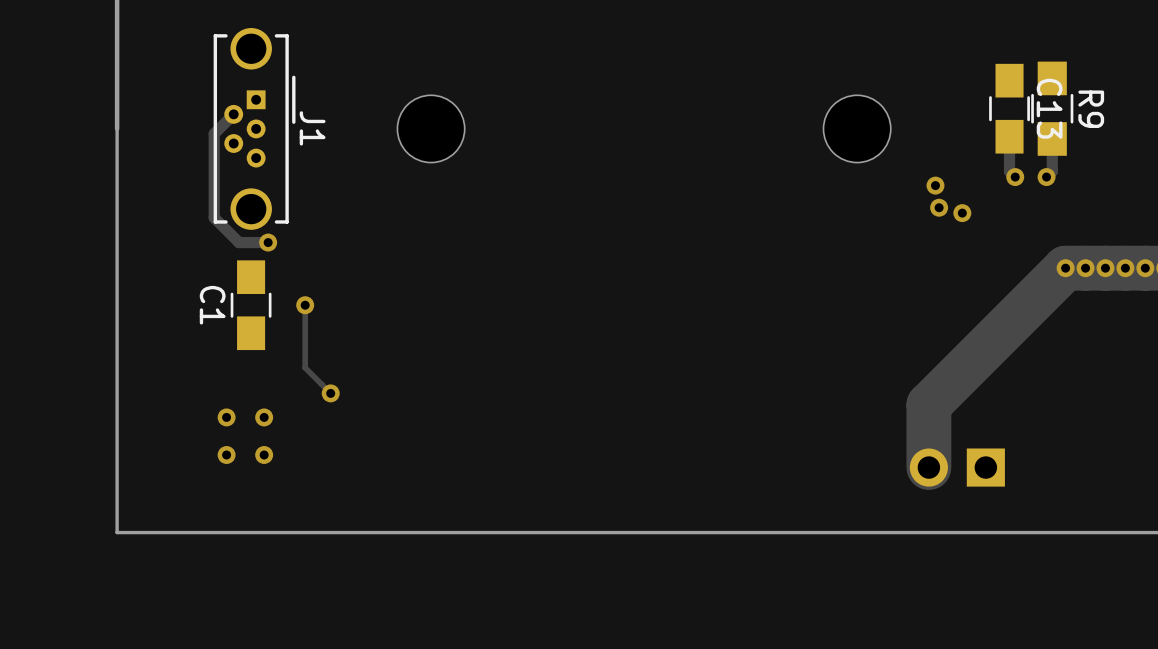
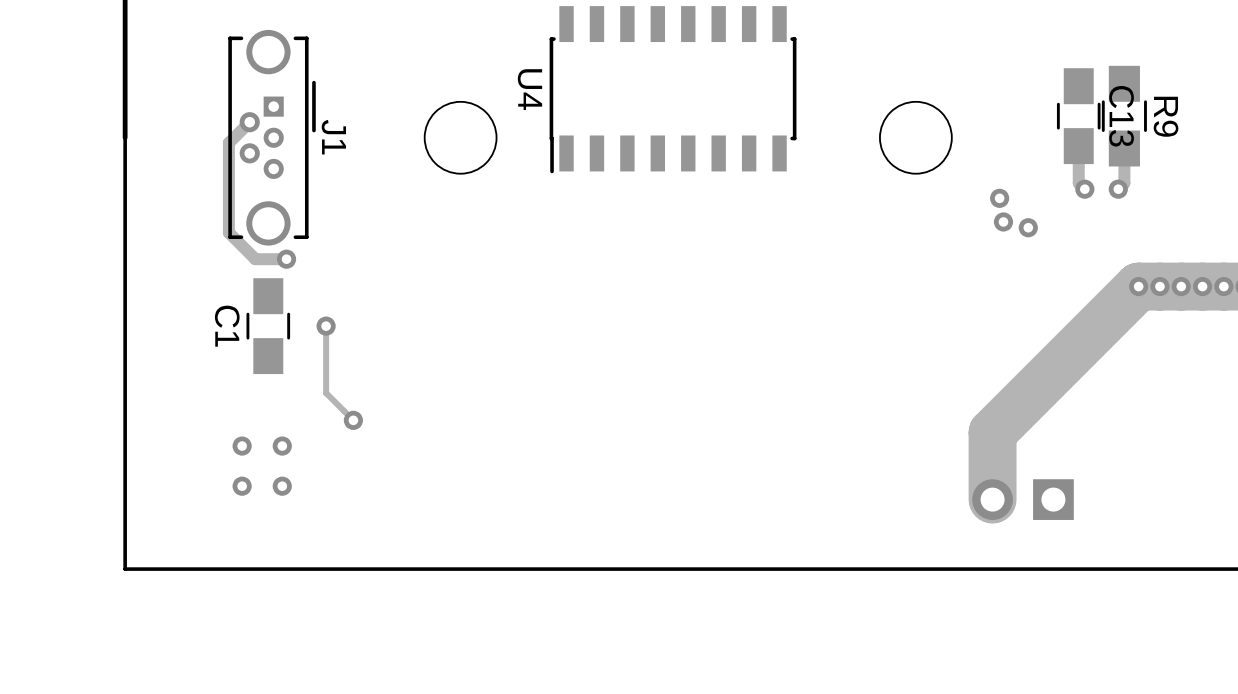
U4: none -> (673, 89)

